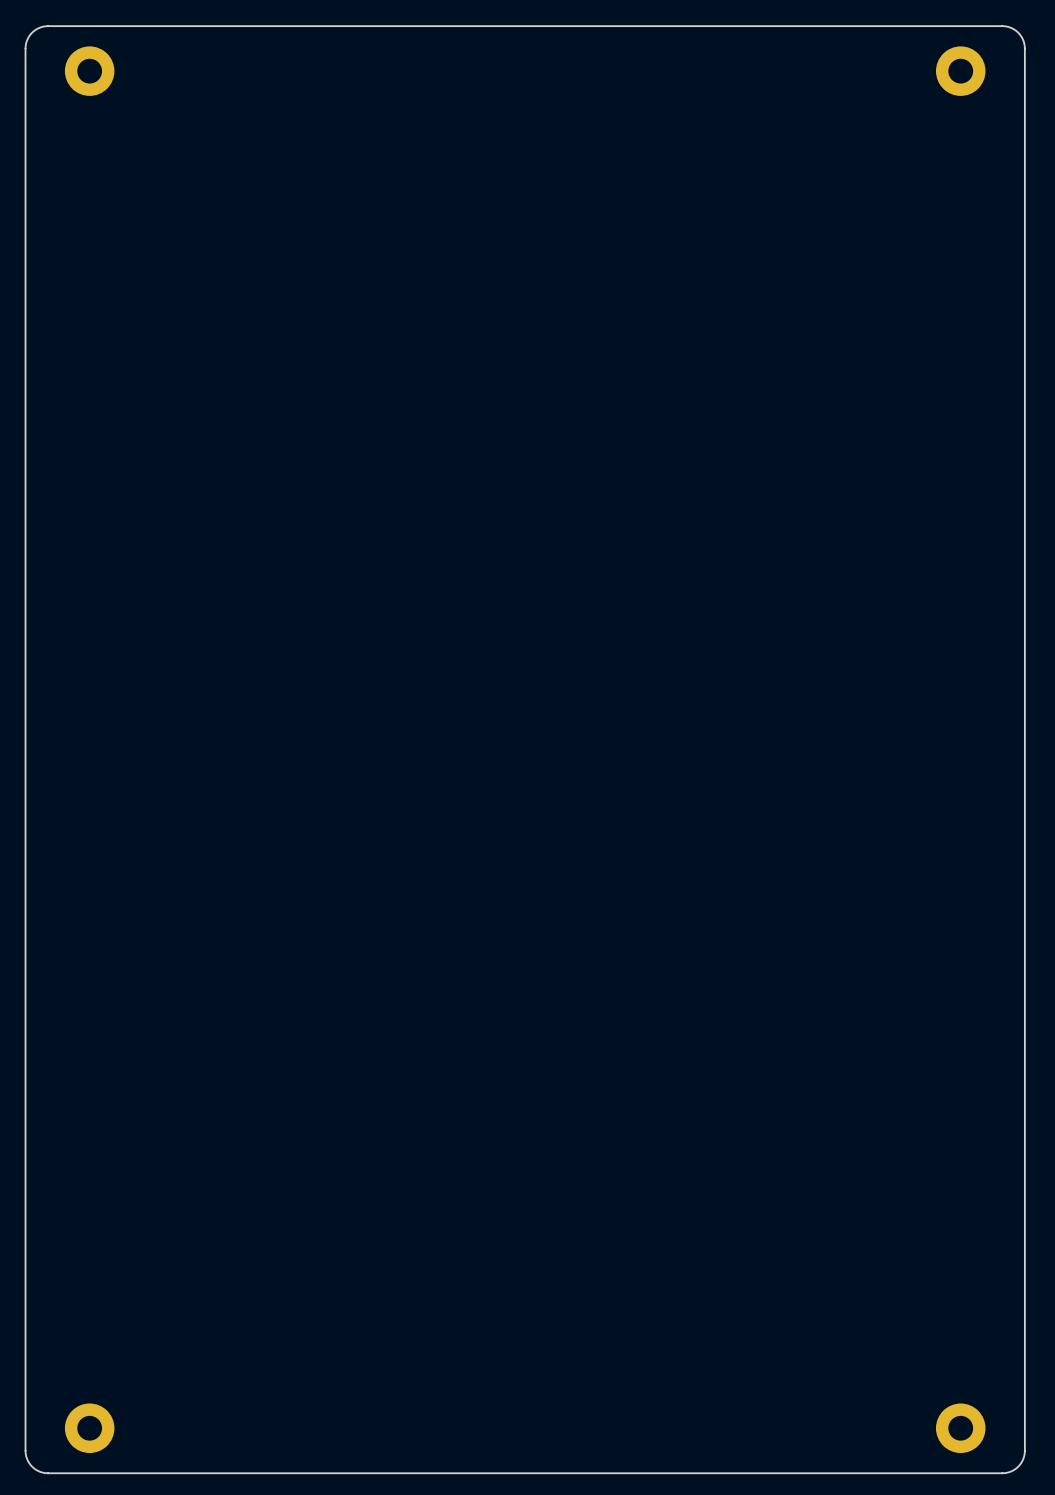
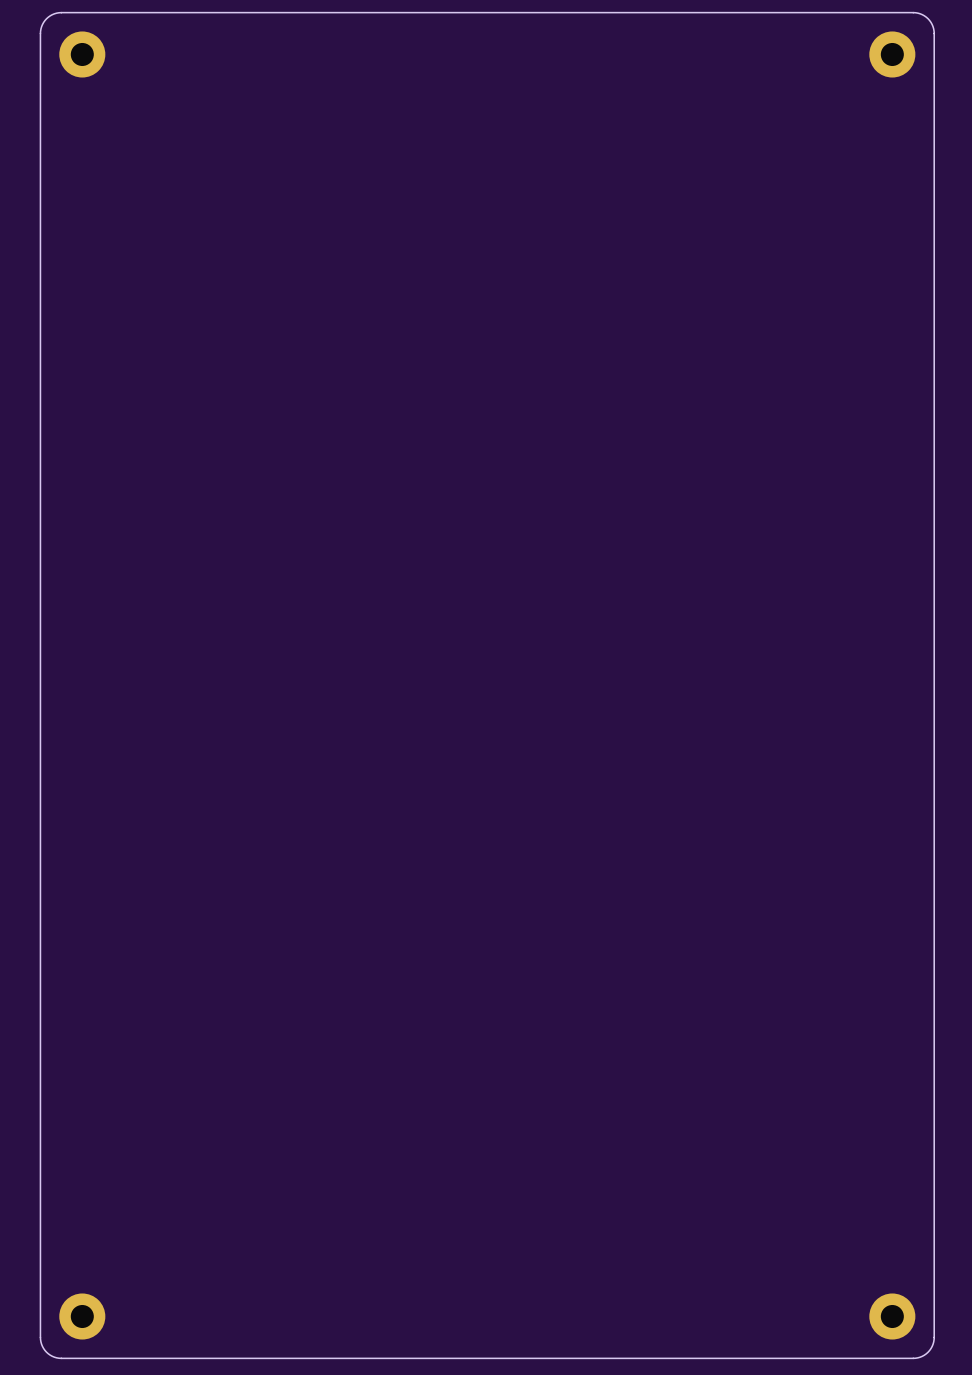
board edge: (67, 26) (45, 26) (38, 28) (28, 36) (25, 48) (25, 1450) (28, 1462) (38, 1471) (45, 1473) (67, 1473) -> (61, 12) (54, 13) (46, 18) (42, 24) (40, 33) (40, 1337) (41, 1344) (46, 1352) (52, 1356) (61, 1358)
board edge: (983, 26) (1004, 26) (1012, 28) (1021, 36) (1024, 48) (1024, 1450) (1021, 1462) (1012, 1471) (1004, 1473) (983, 1473) -> (913, 12) (922, 14) (928, 18) (932, 24) (934, 33) (934, 1337) (932, 1346) (928, 1352) (922, 1356) (913, 1358)

